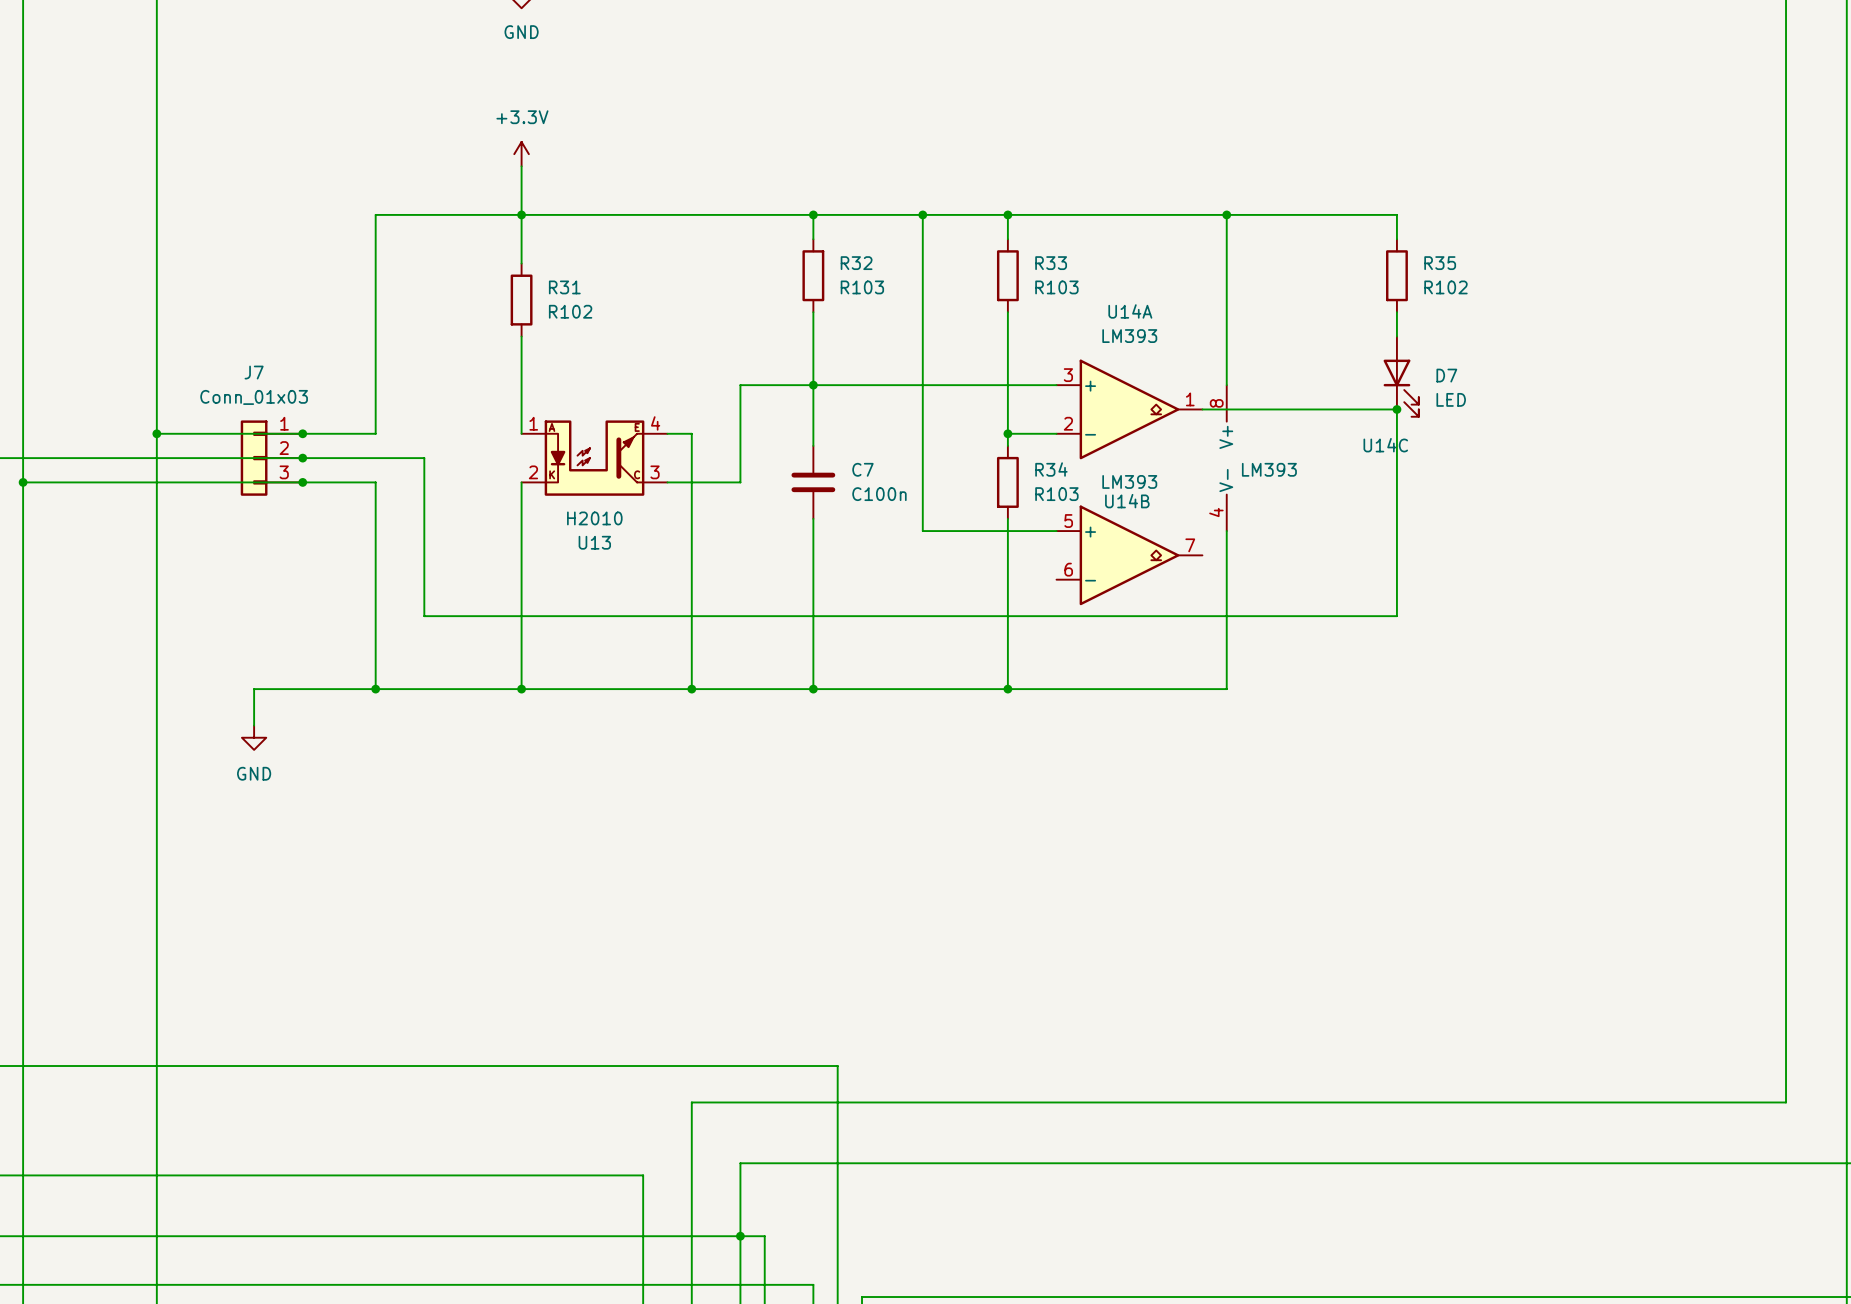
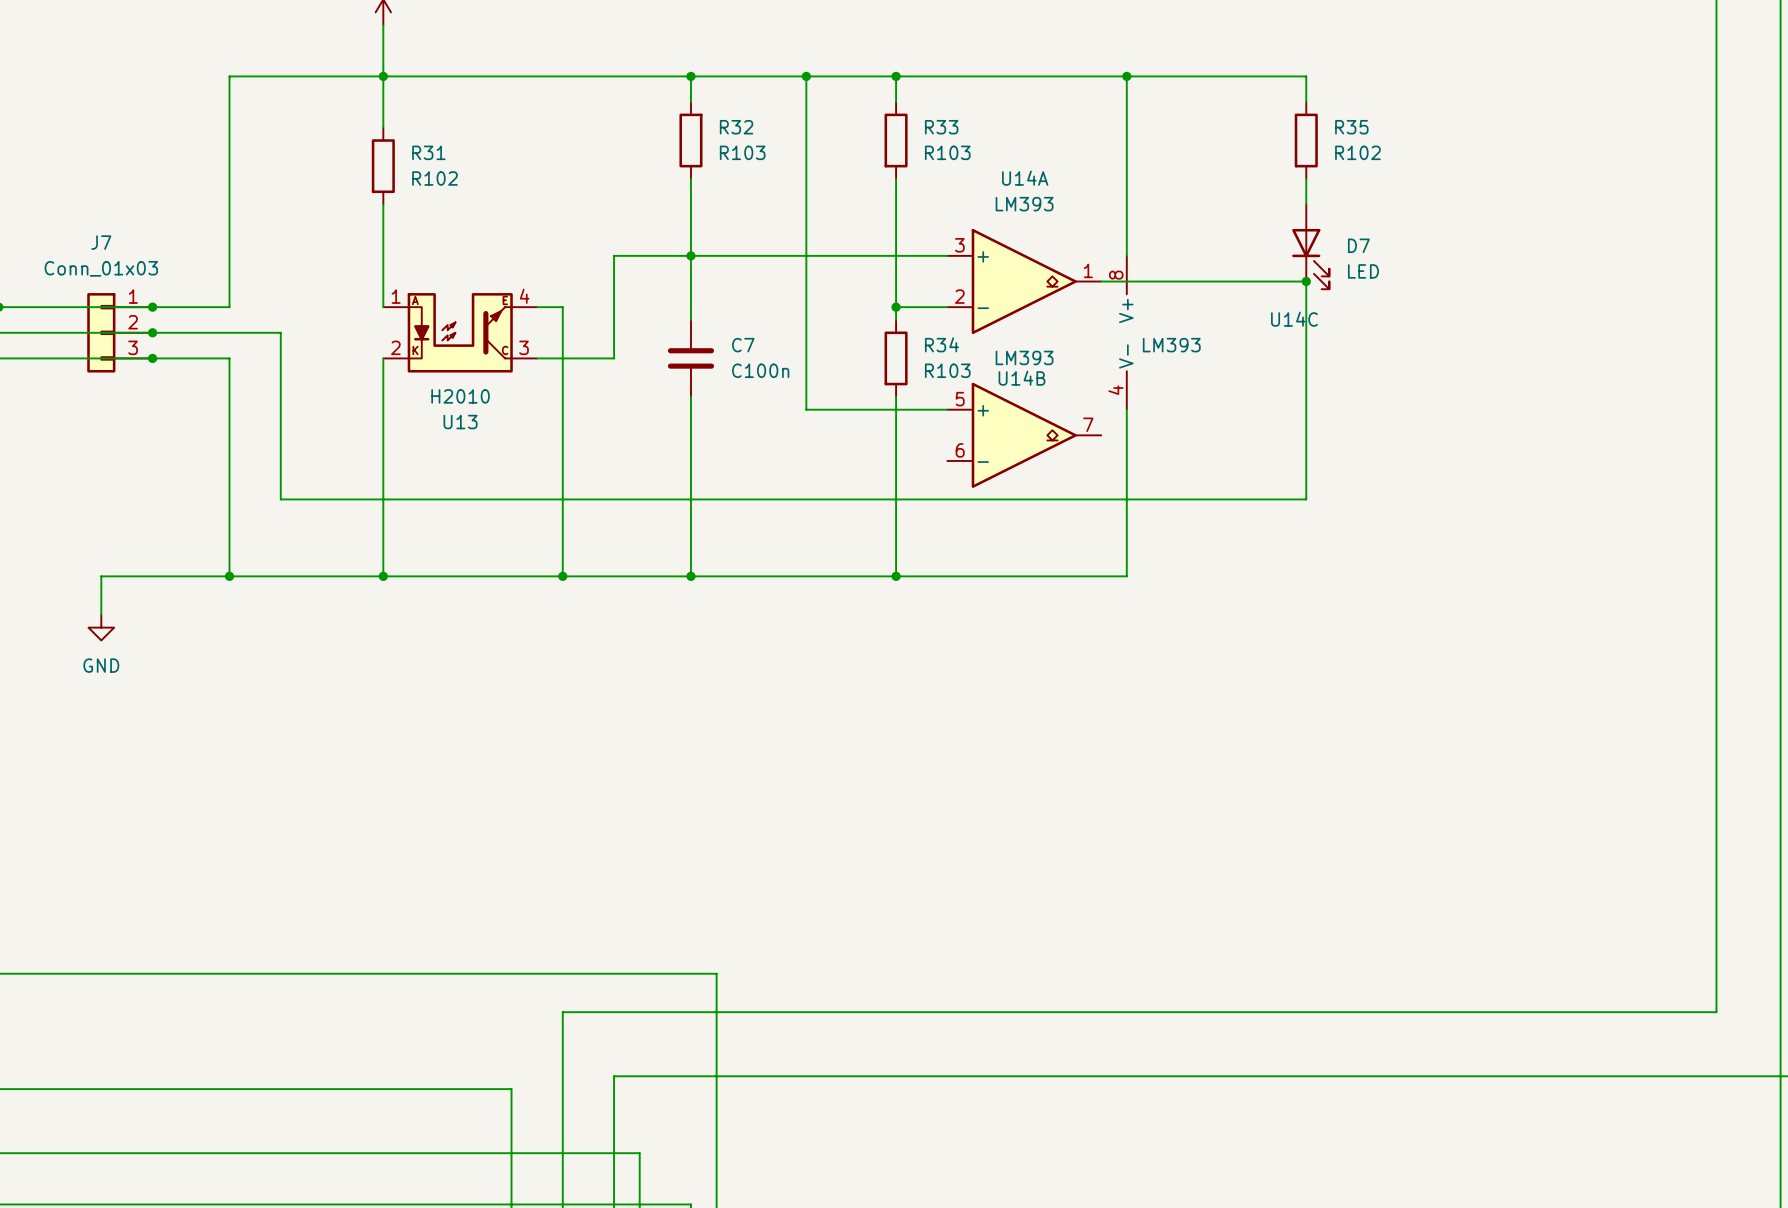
junction: (740, 1236) -> none

